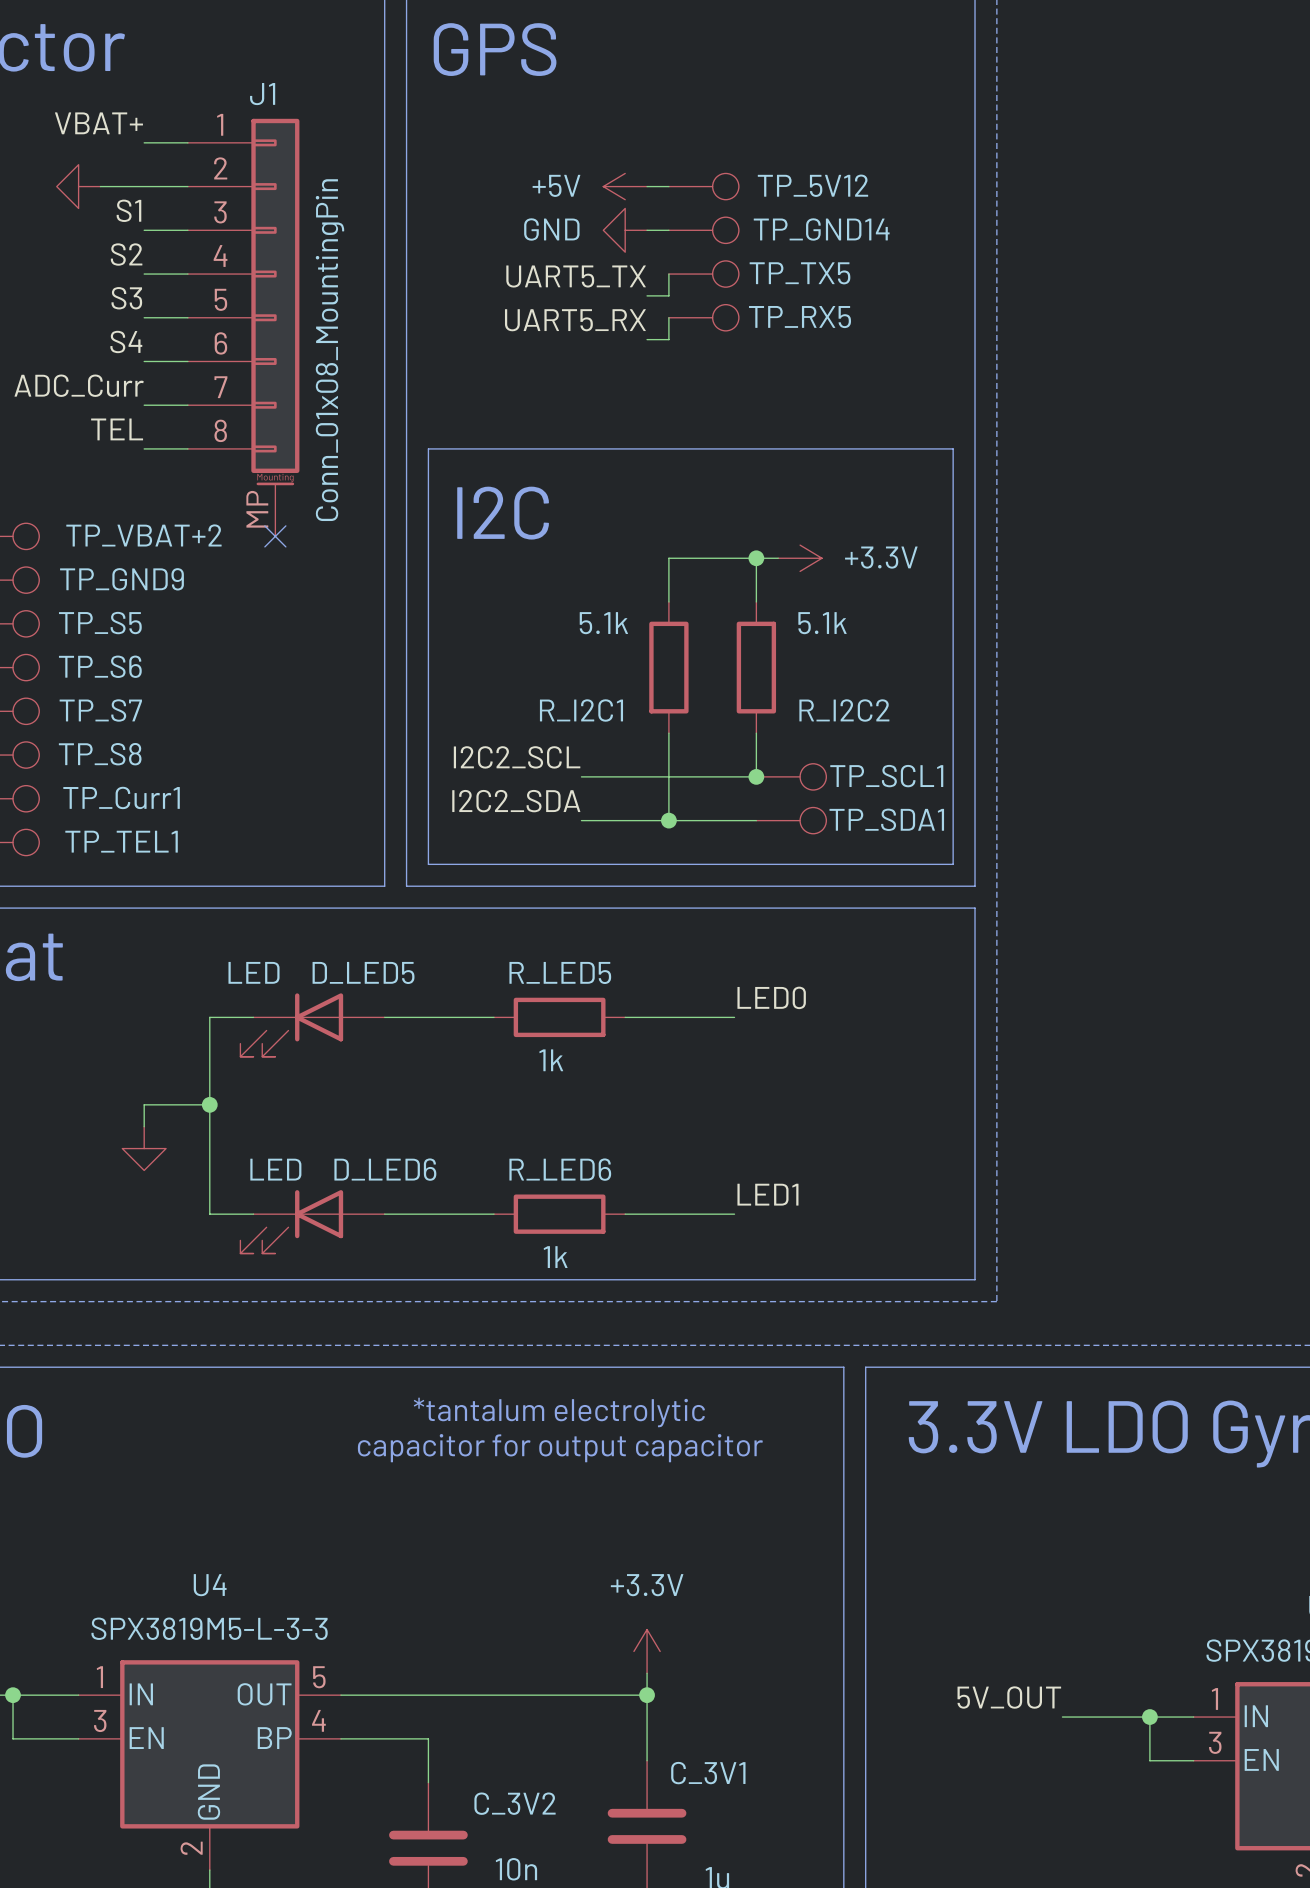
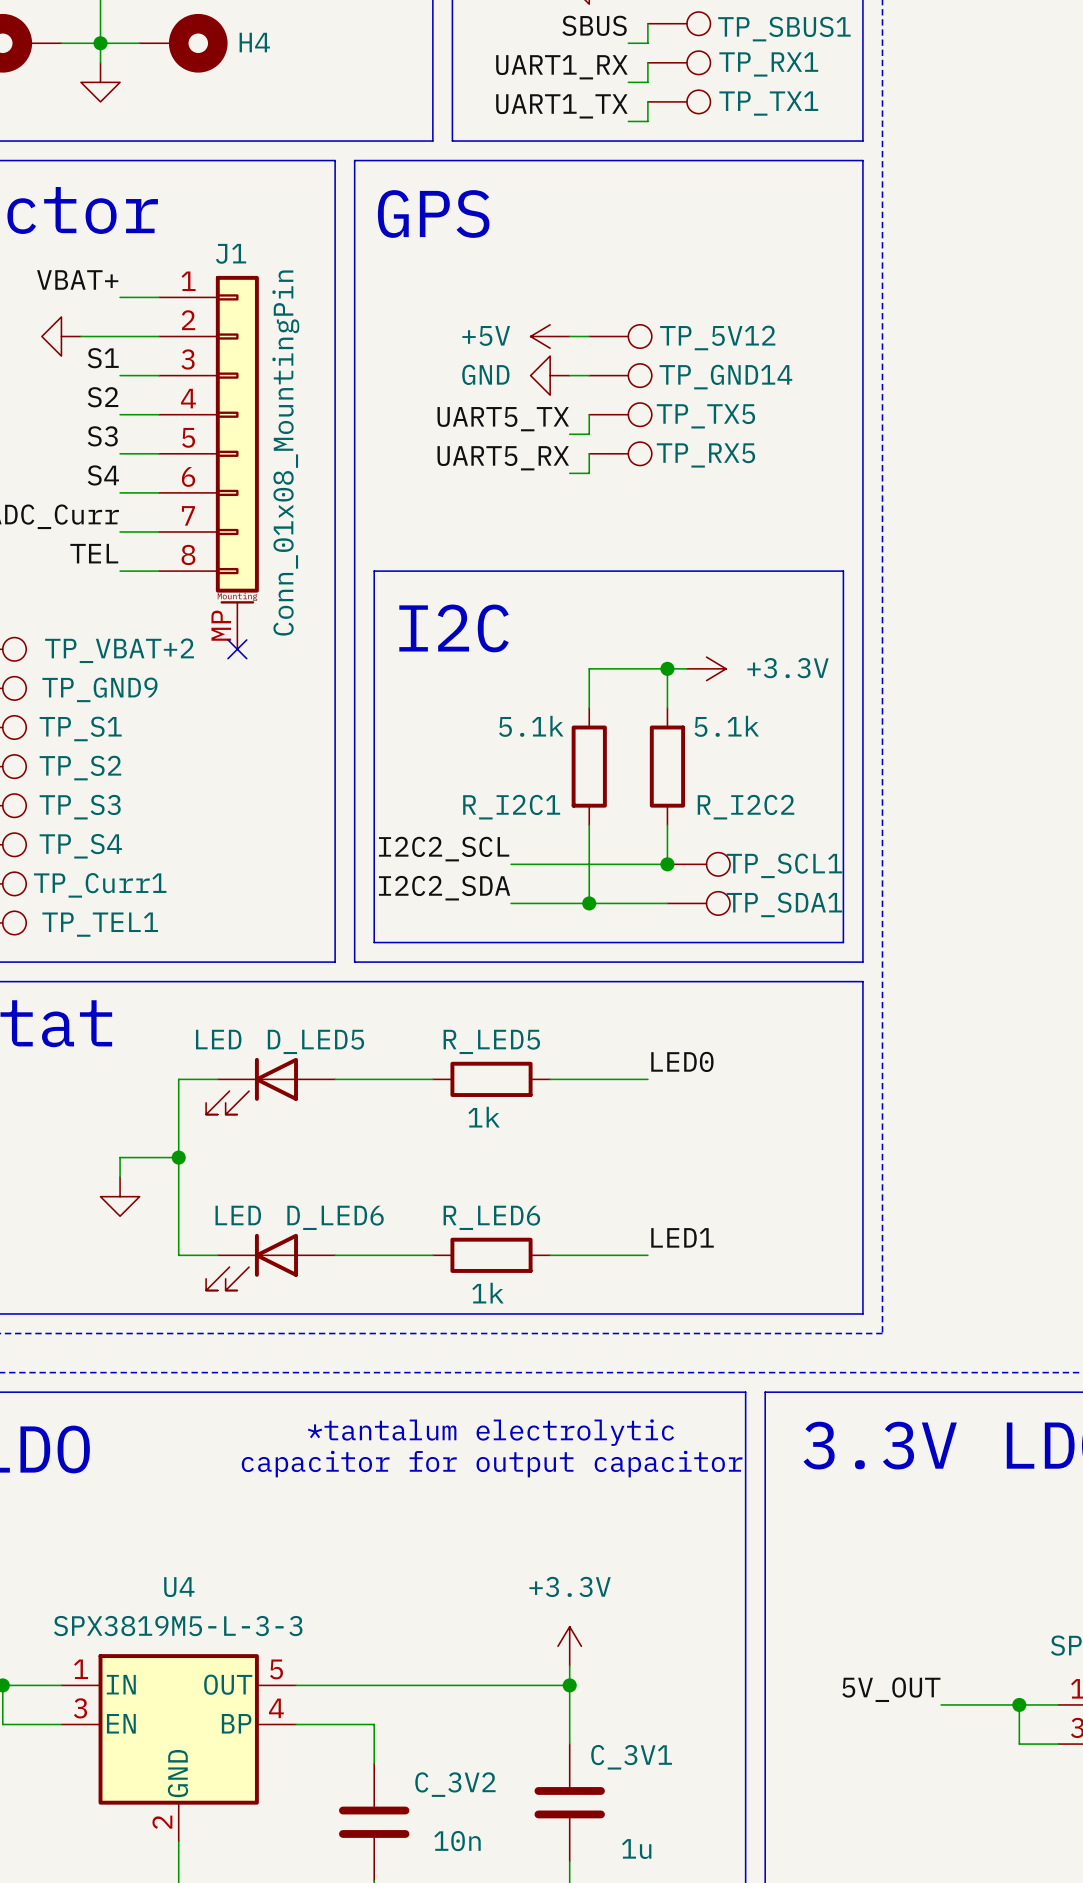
TP_S5 name: TP_S5 (100, 623) -> TP_S1 (80, 728)
TP_S6 name: TP_S6 (100, 666) -> TP_S2 (80, 768)
TP_S7 name: TP_S7 (100, 710) -> TP_S3 (80, 807)
TP_S8 name: TP_S8 (100, 754) -> TP_S4 (80, 846)

